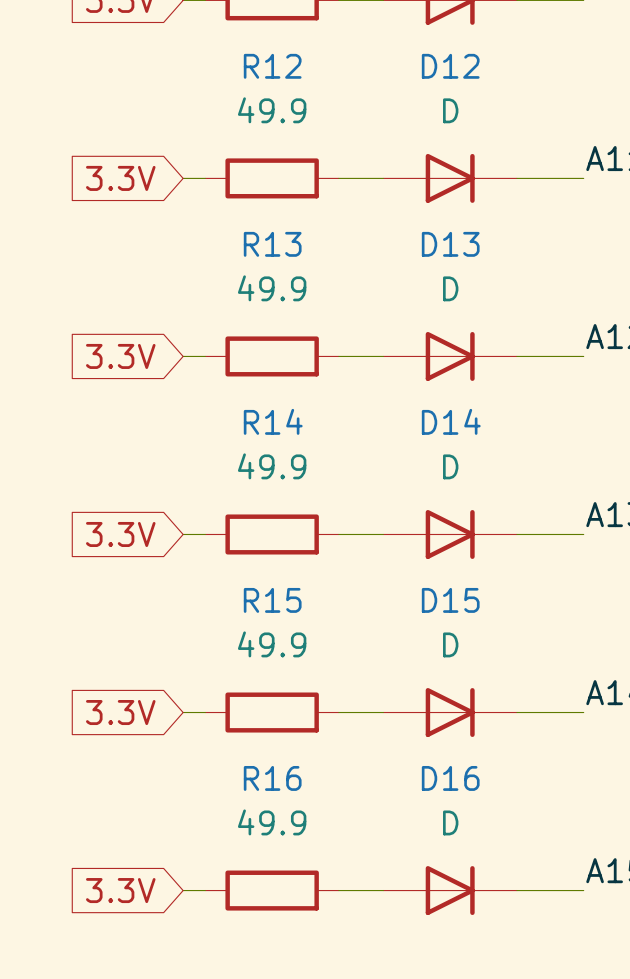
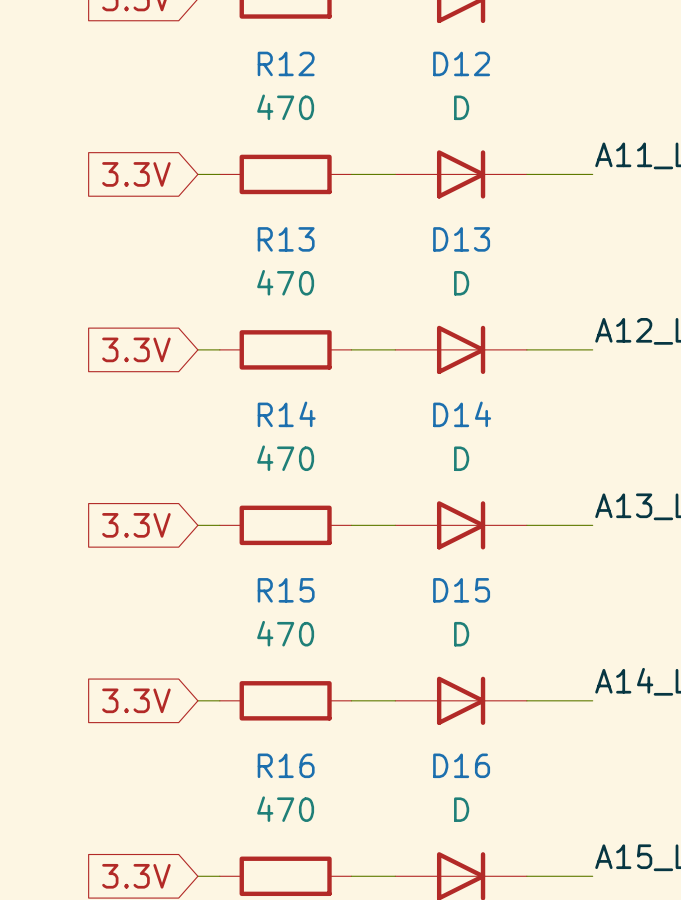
R12 value: 49.9 (272, 110) -> 470 (285, 107)
R13 value: 49.9 (272, 288) -> 470 (285, 282)
R14 value: 49.9 (272, 466) -> 470 (285, 458)
R15 value: 49.9 (272, 644) -> 470 (285, 633)
R16 value: 49.9 (272, 822) -> 470 (285, 809)

